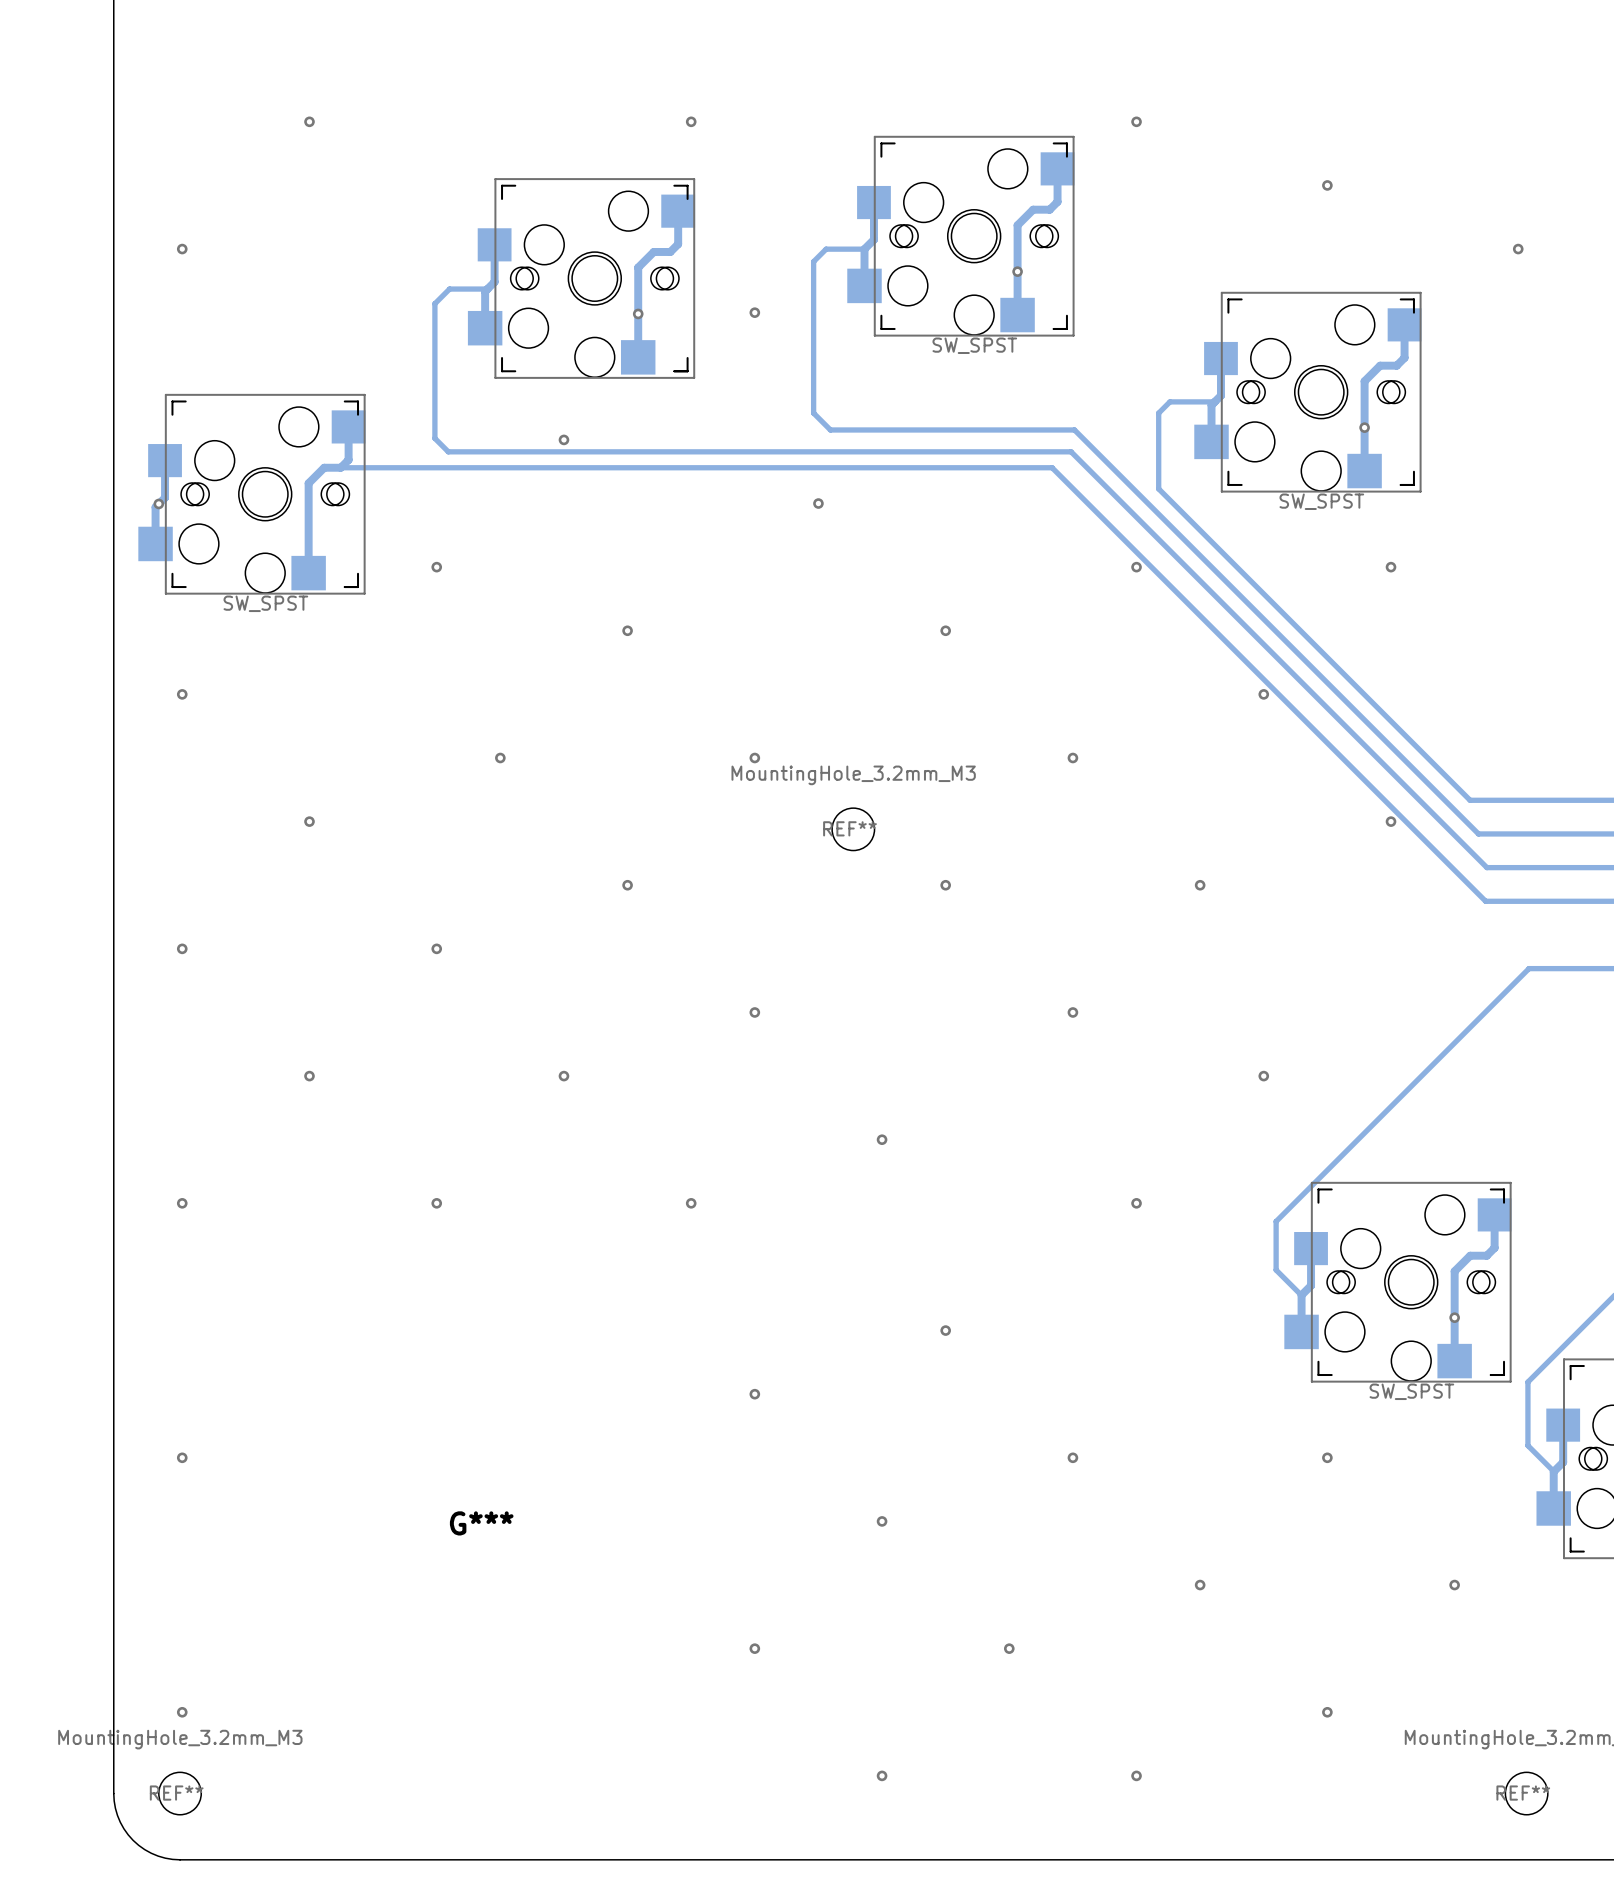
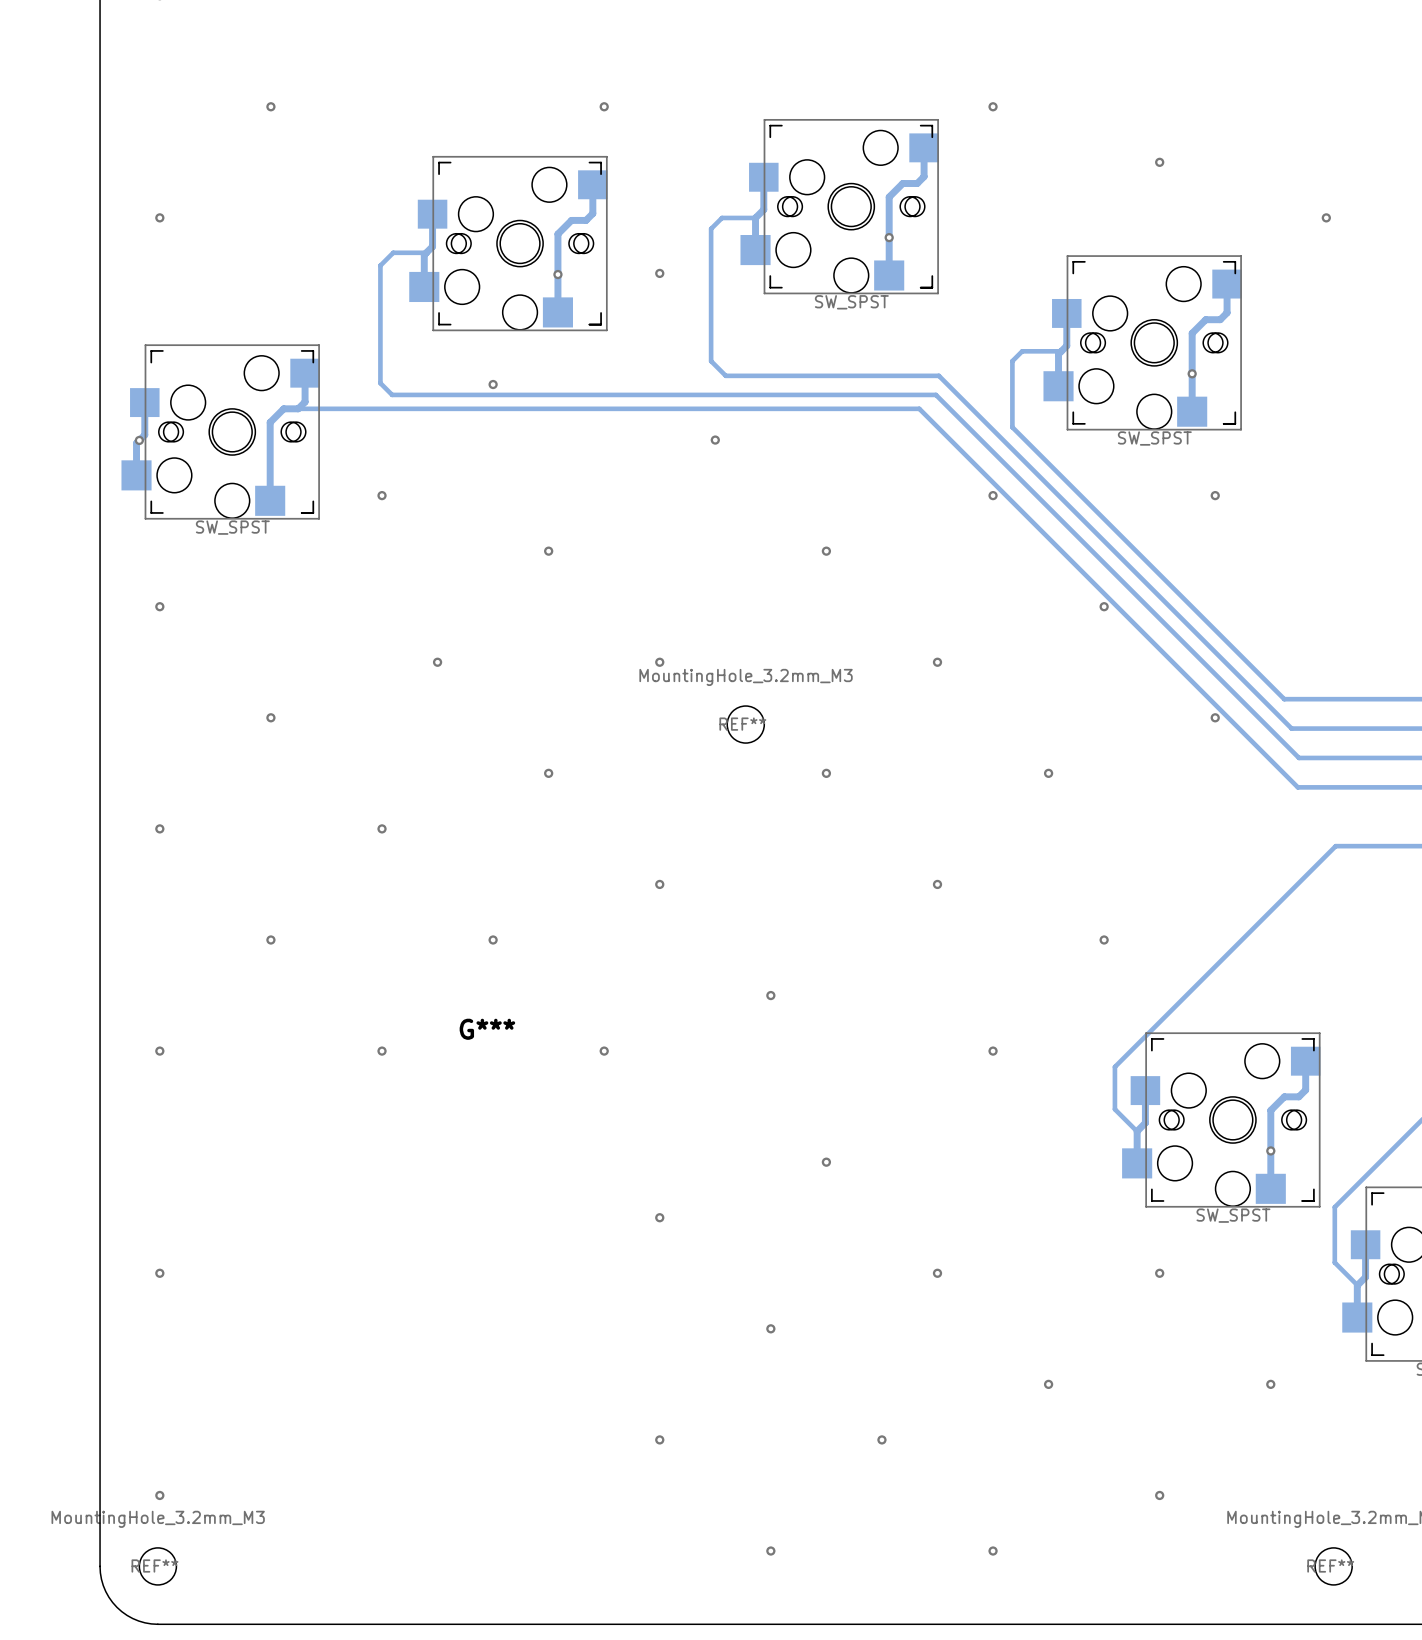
G***: none -> (487, 1029)
G***: (481, 1523) -> none

